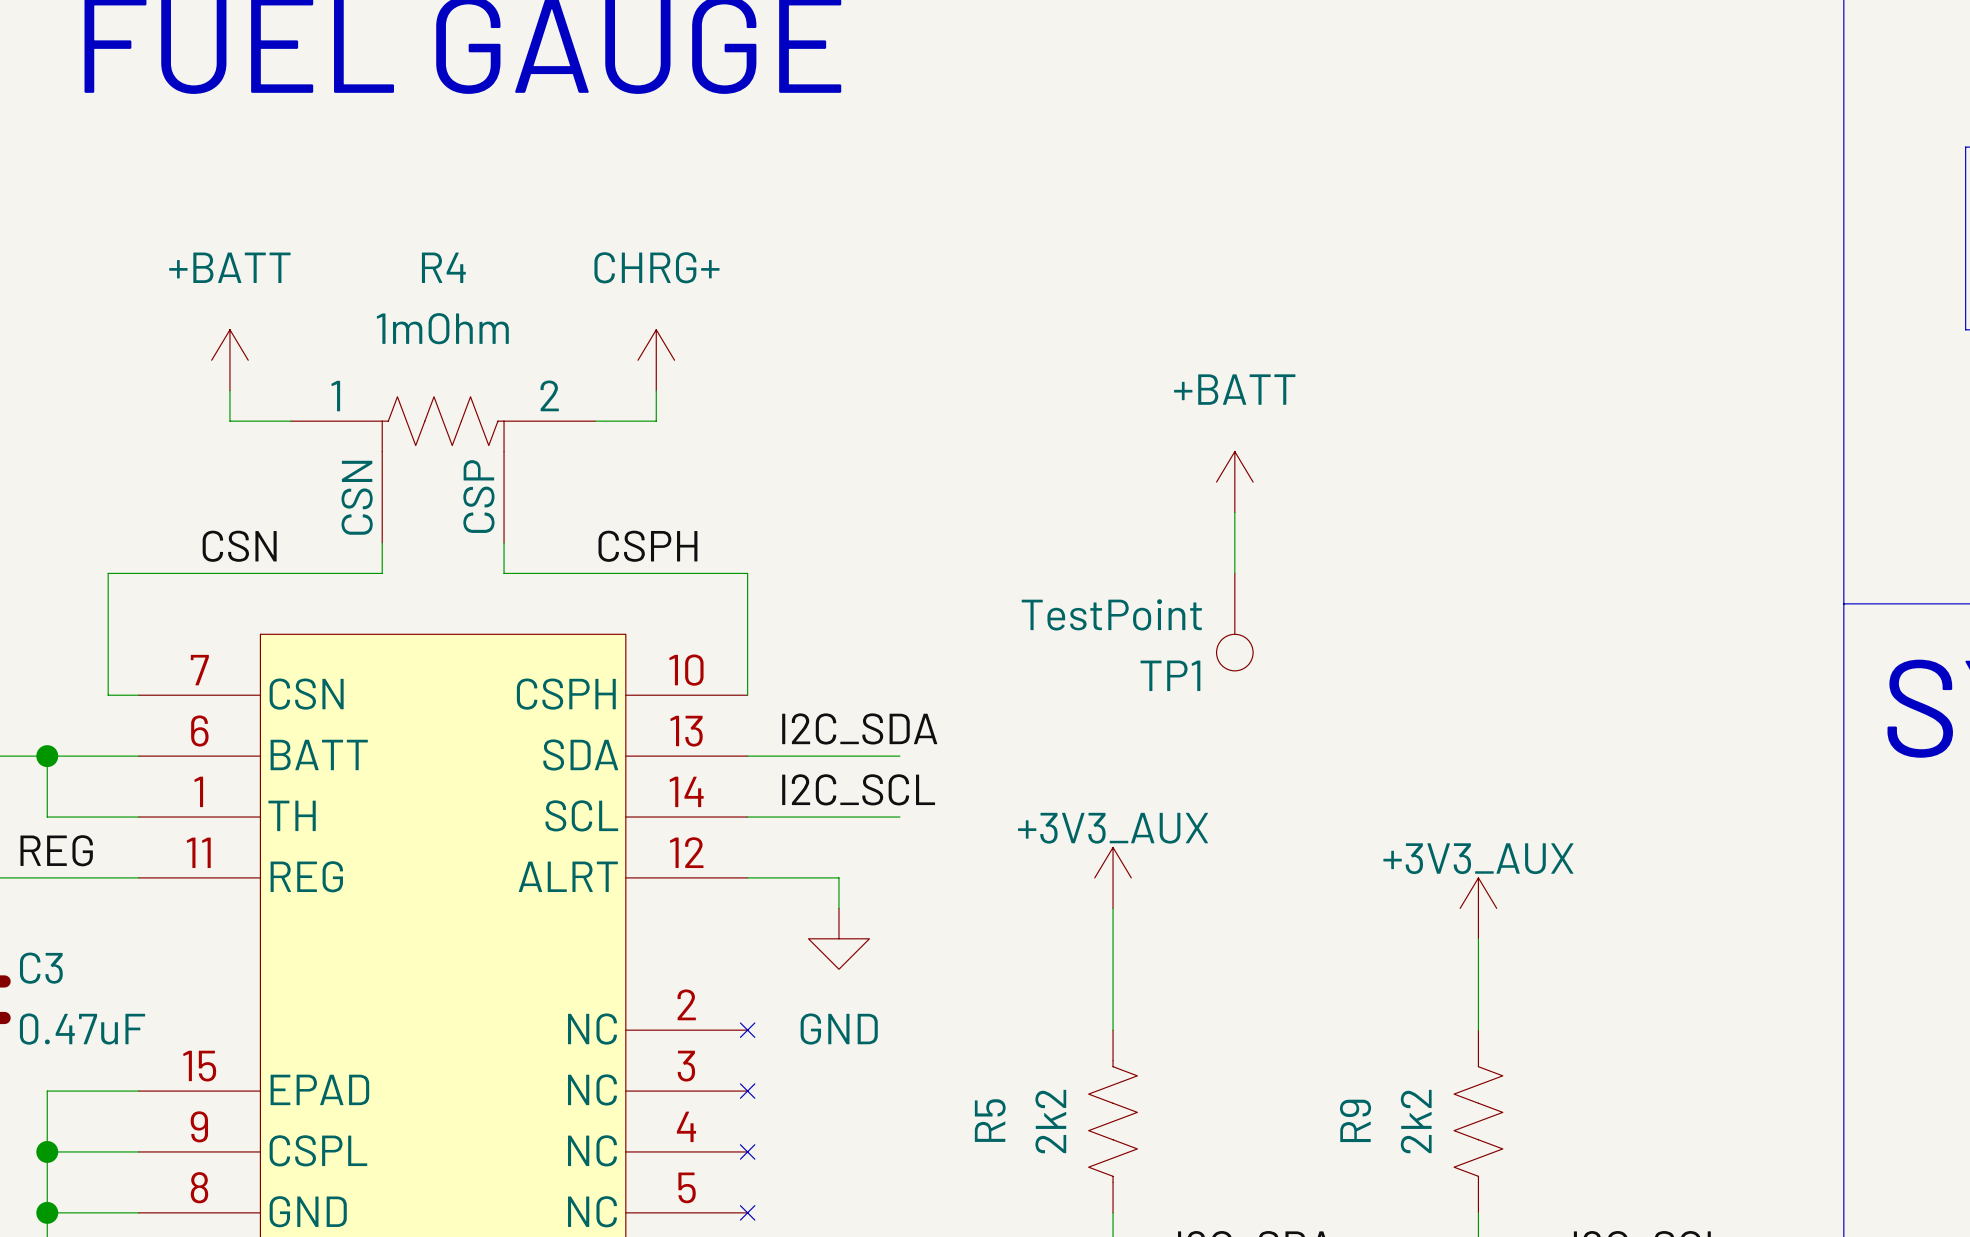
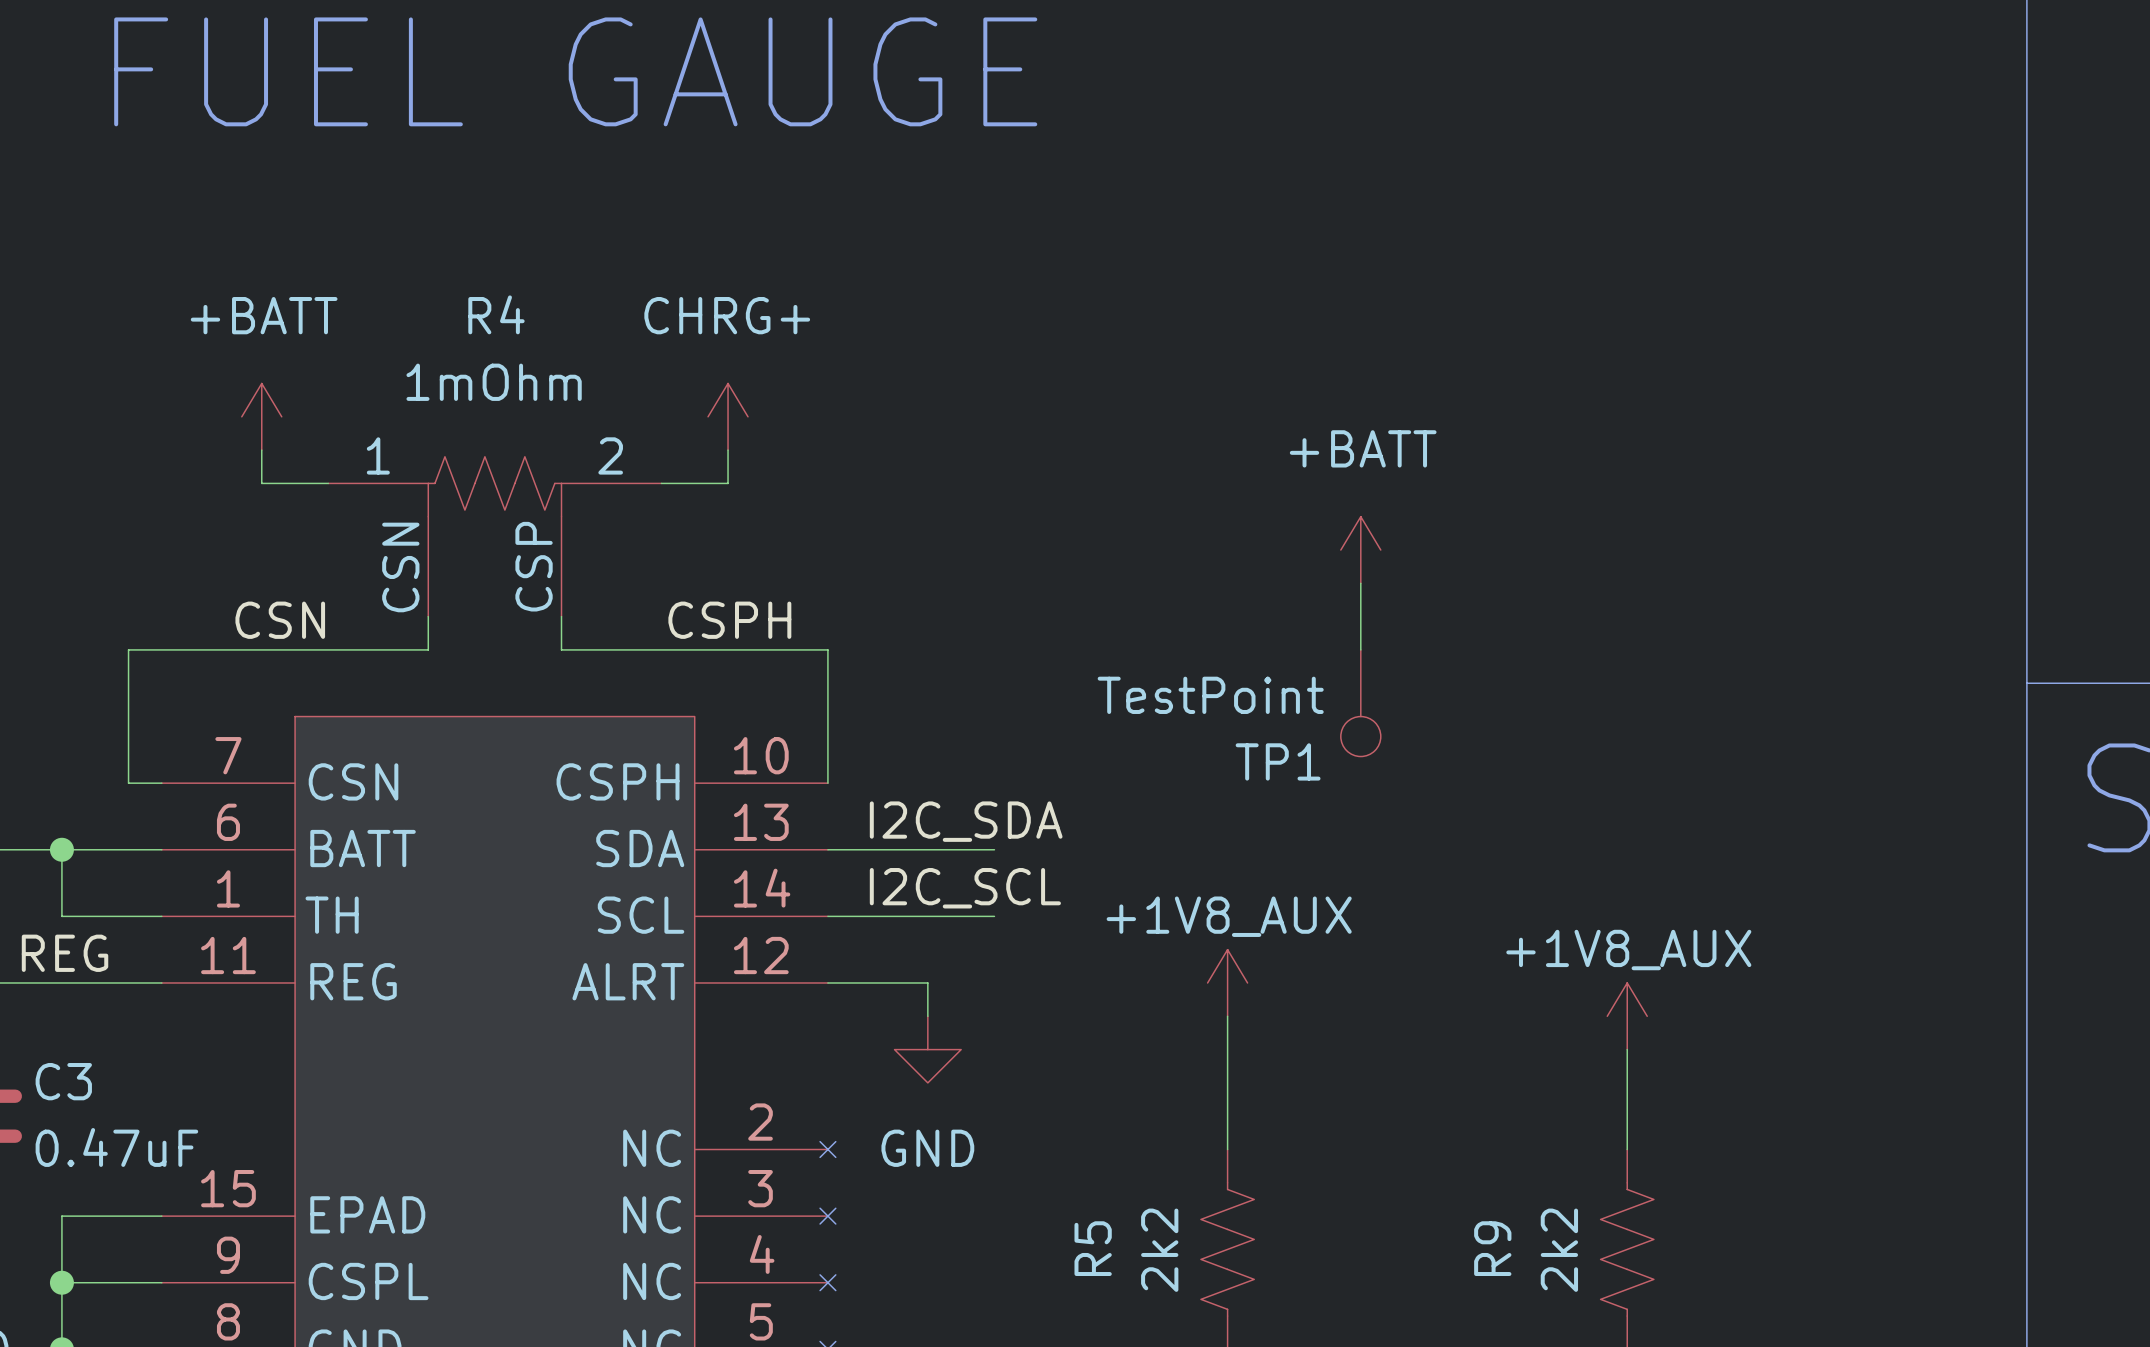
power symbol: +3V3_AUX (1113, 877) -> +1V8_AUX (1227, 982)
power symbol: +3V3_AUX (1478, 908) -> +1V8_AUX (1627, 1016)

